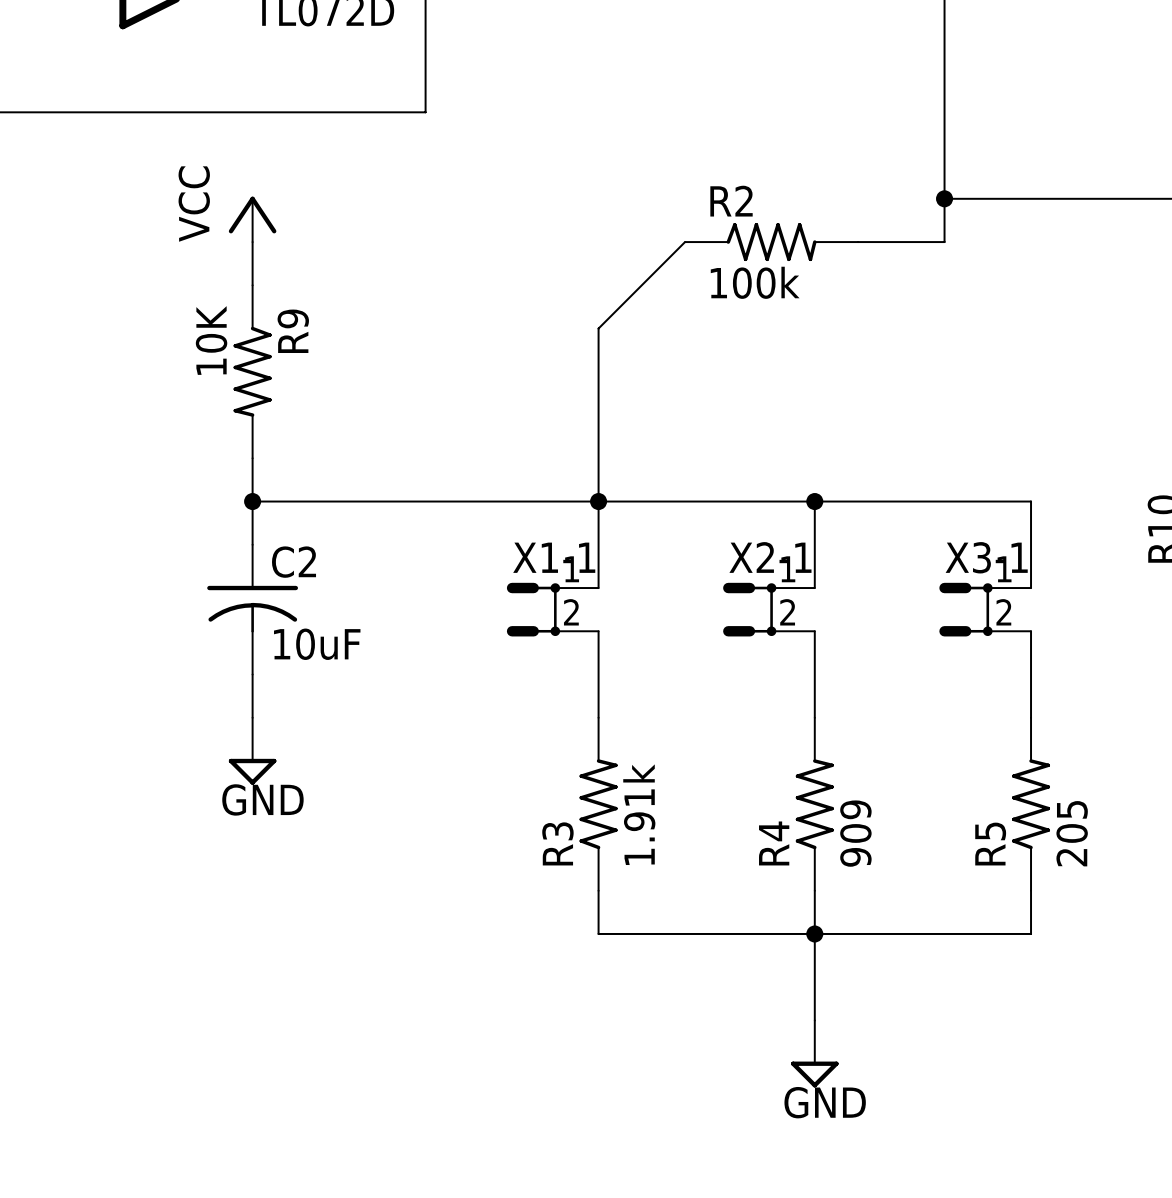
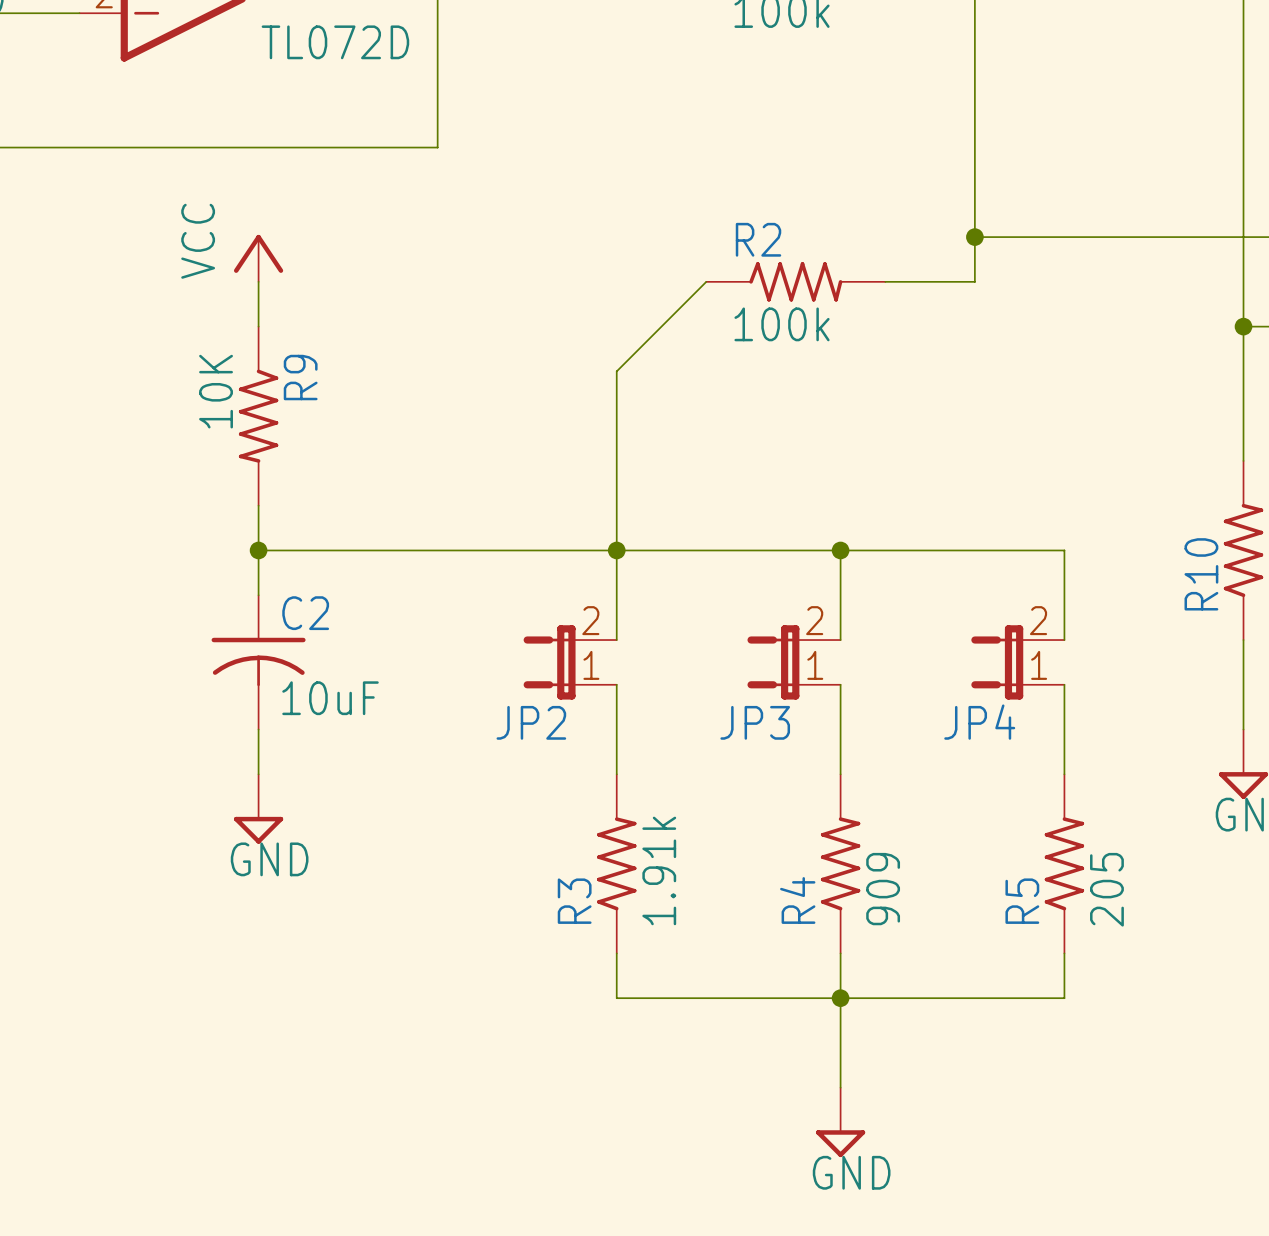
X1-1: (552, 609) -> none
JP2: none -> (570, 662)
X2-1: (768, 609) -> none
JP3: none -> (794, 662)
X3-1: (985, 609) -> none
JP4: none -> (1017, 662)

